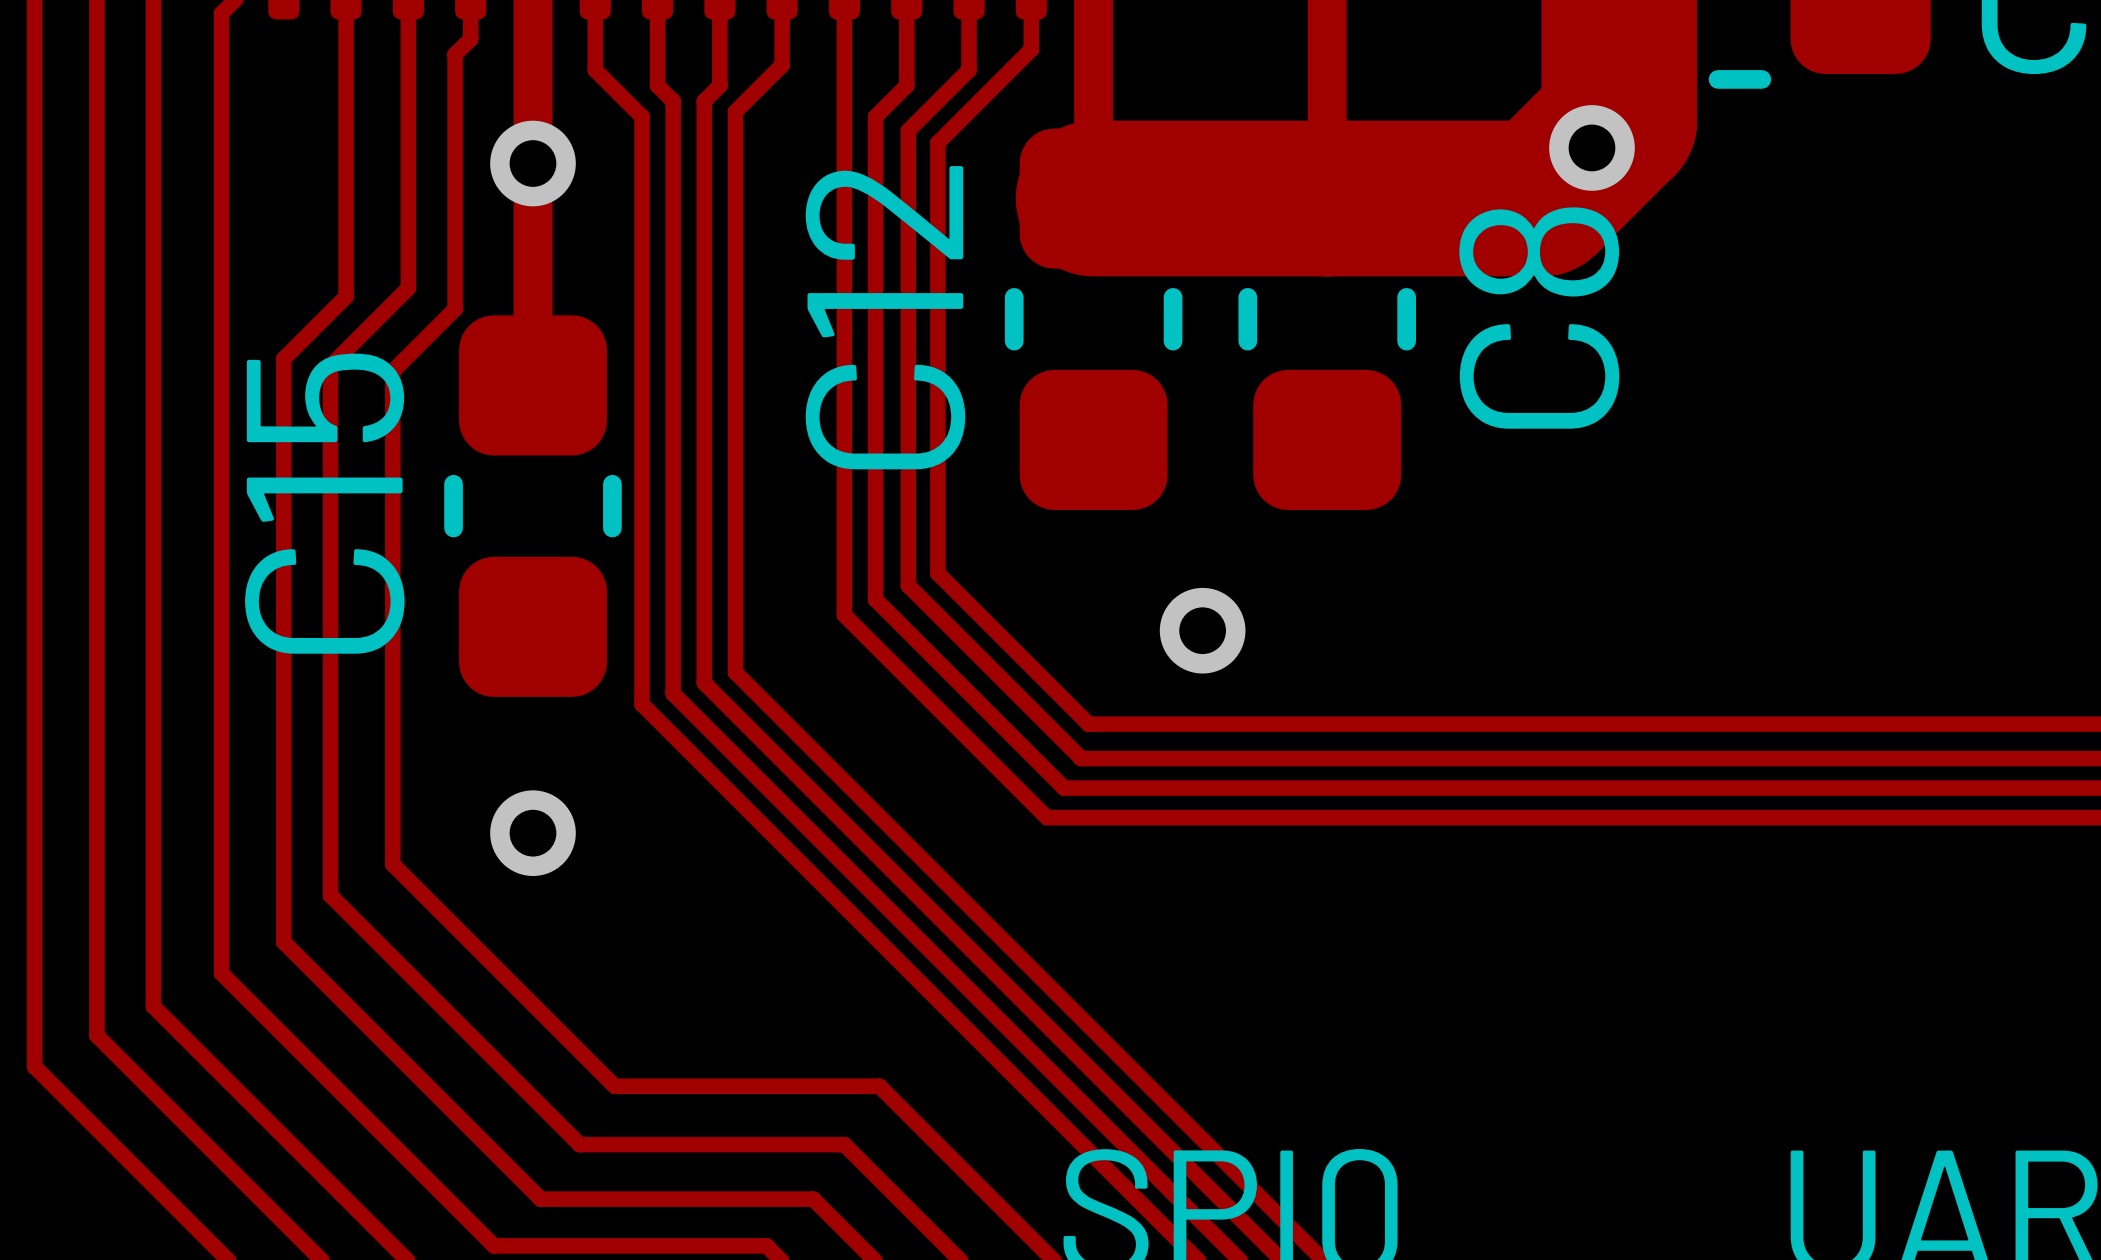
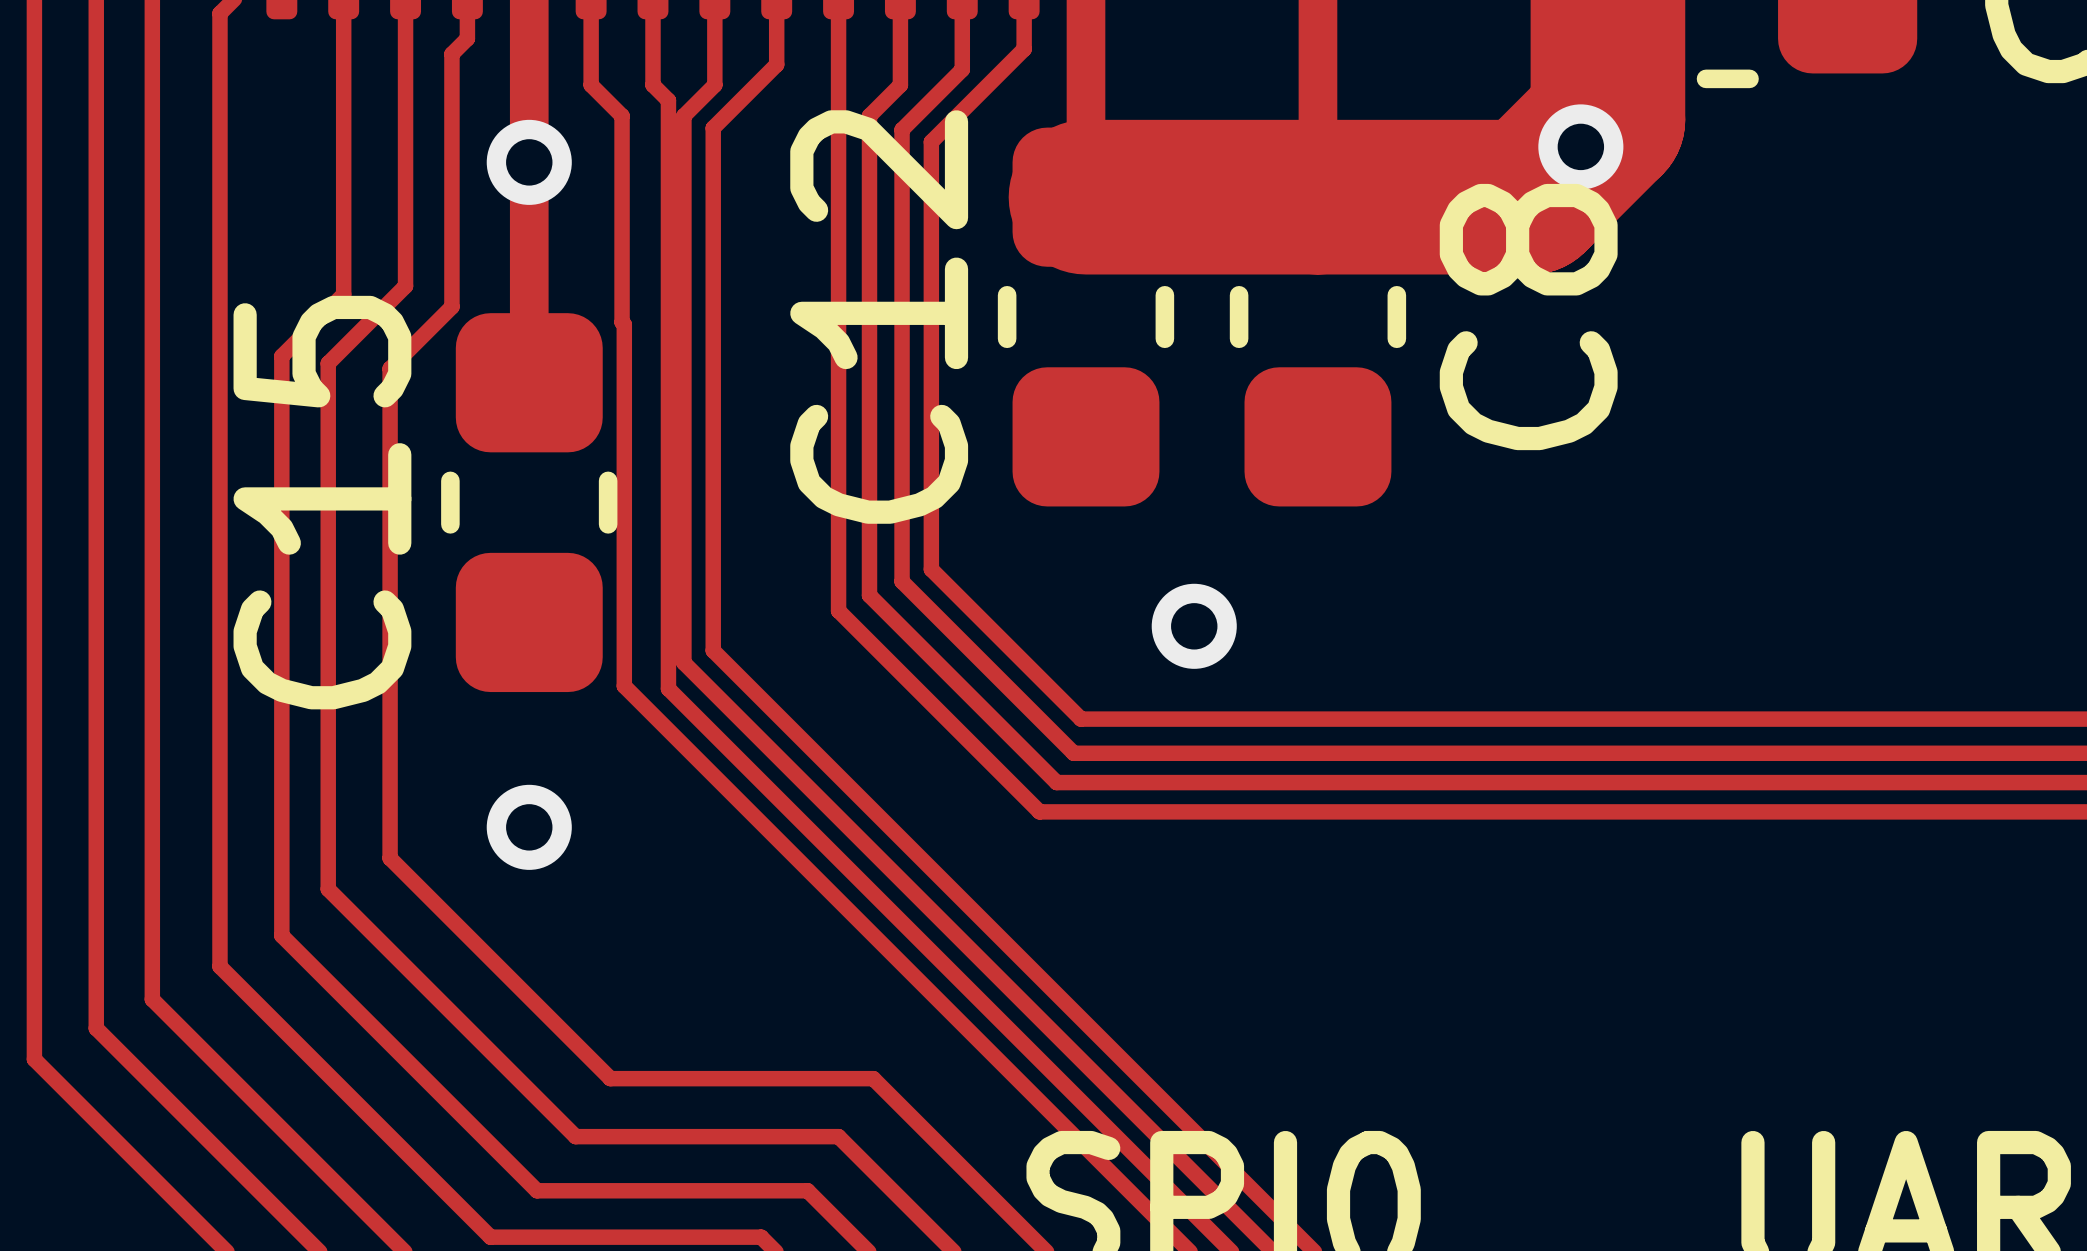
track: (595, 70) (642, 116) (642, 704) -> (591, 69) (591, 85) (622, 115) (624, 686) (637, 699)
track: (704, 101) (704, 683) -> (699, 100) (683, 115) (683, 662) (699, 678)
track: (735, 111) (735, 672) -> (730, 111) (713, 128) (713, 650) (730, 667)

